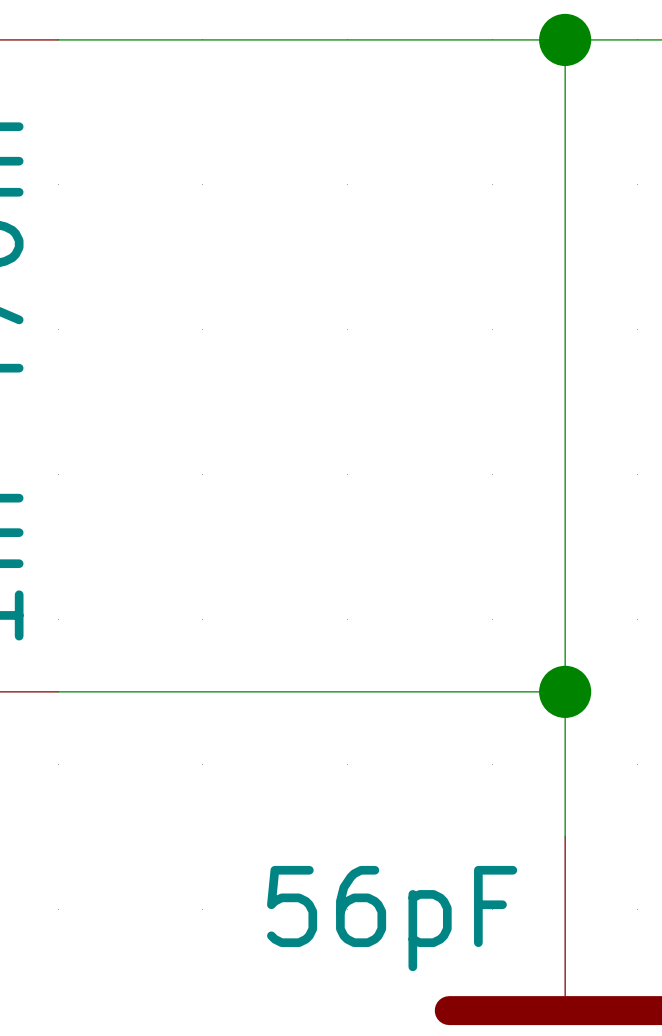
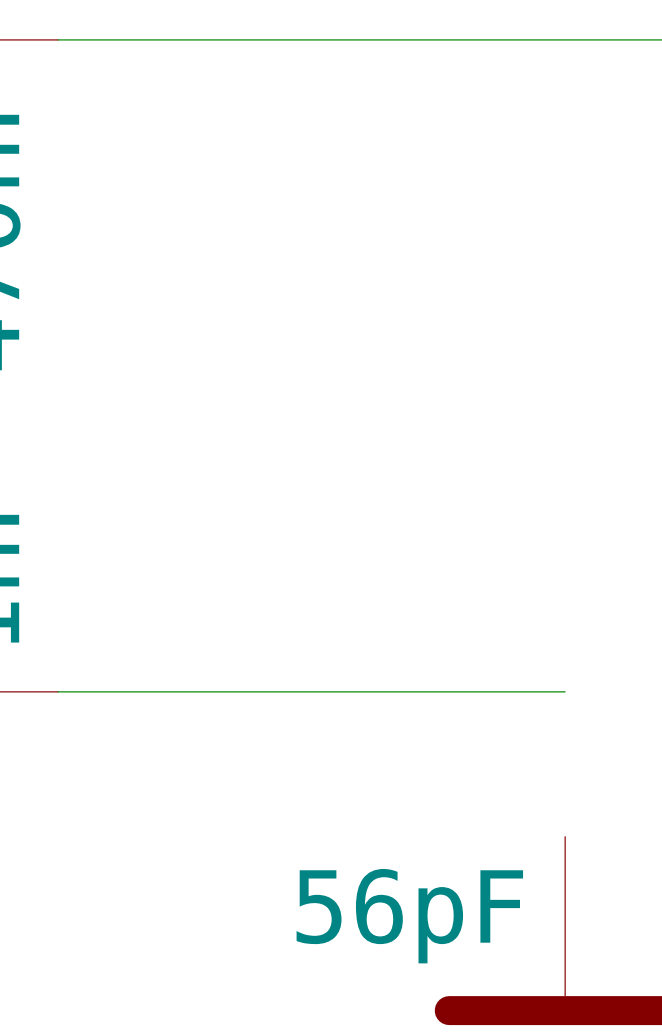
wire: (565, 39) (565, 836) -> none
junction: (565, 39) -> none
junction: (565, 691) -> none

